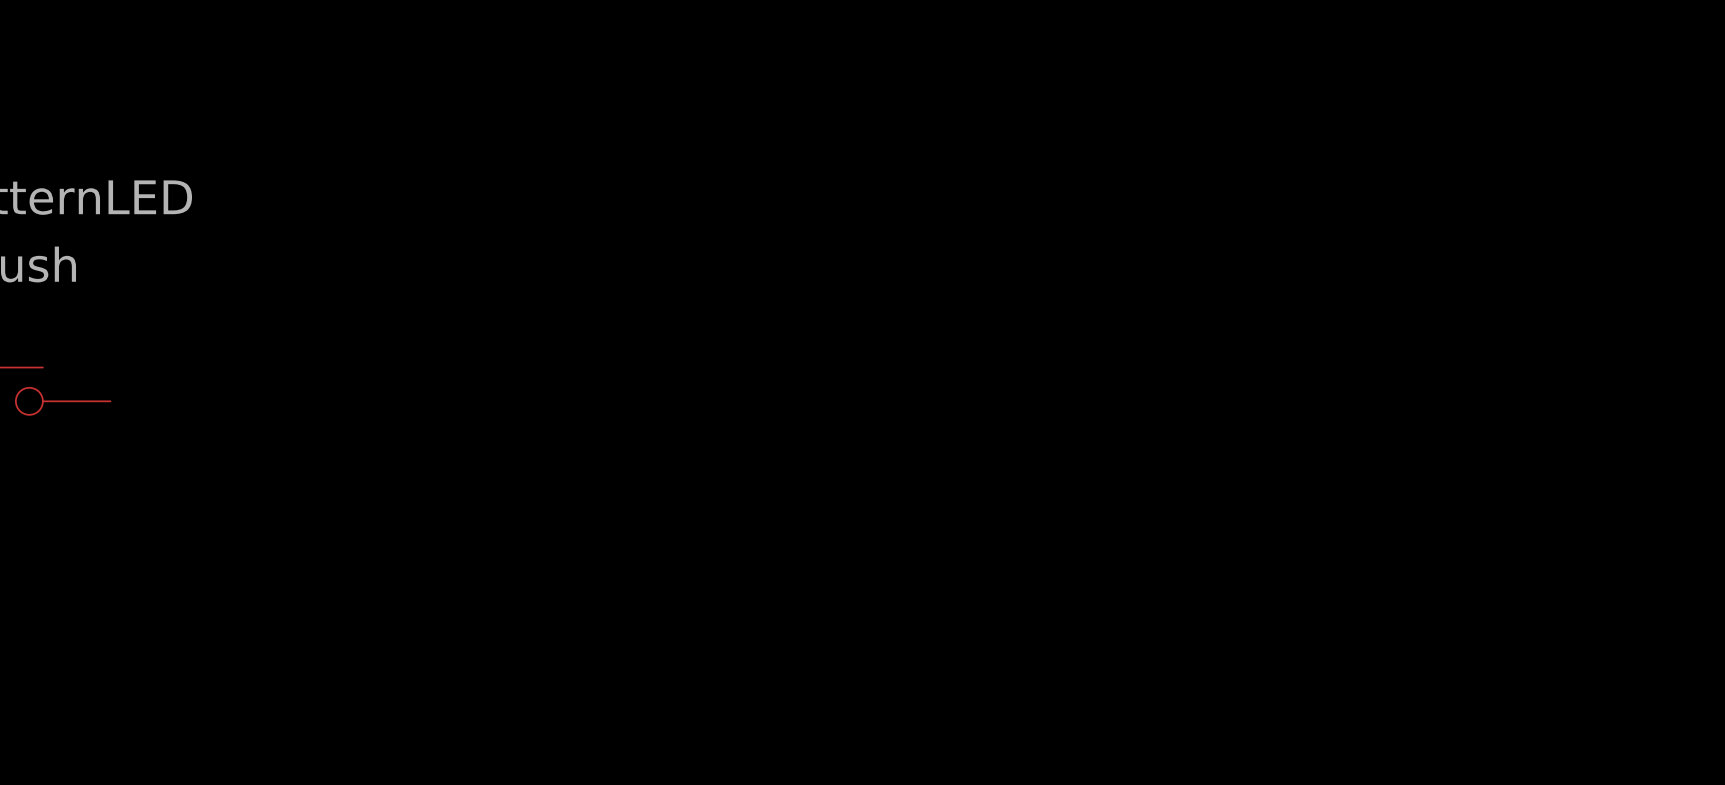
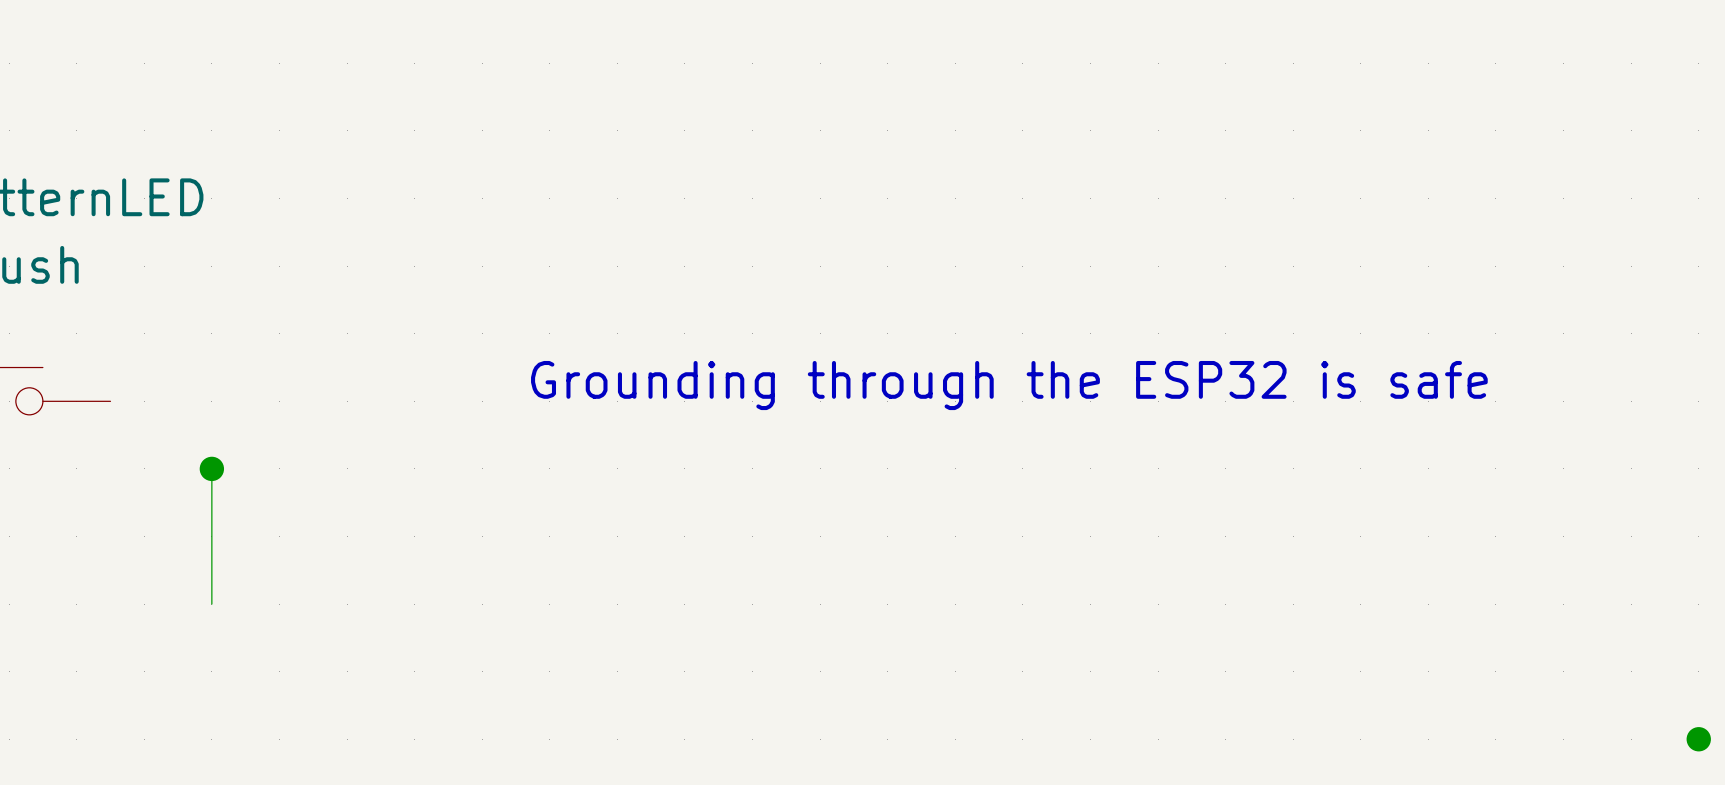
text: none -> Grounding through the ESP32 is safe (1009, 385)
wire: none -> (211, 468) (211, 604)
junction: none -> (211, 468)
junction: none -> (1698, 739)

